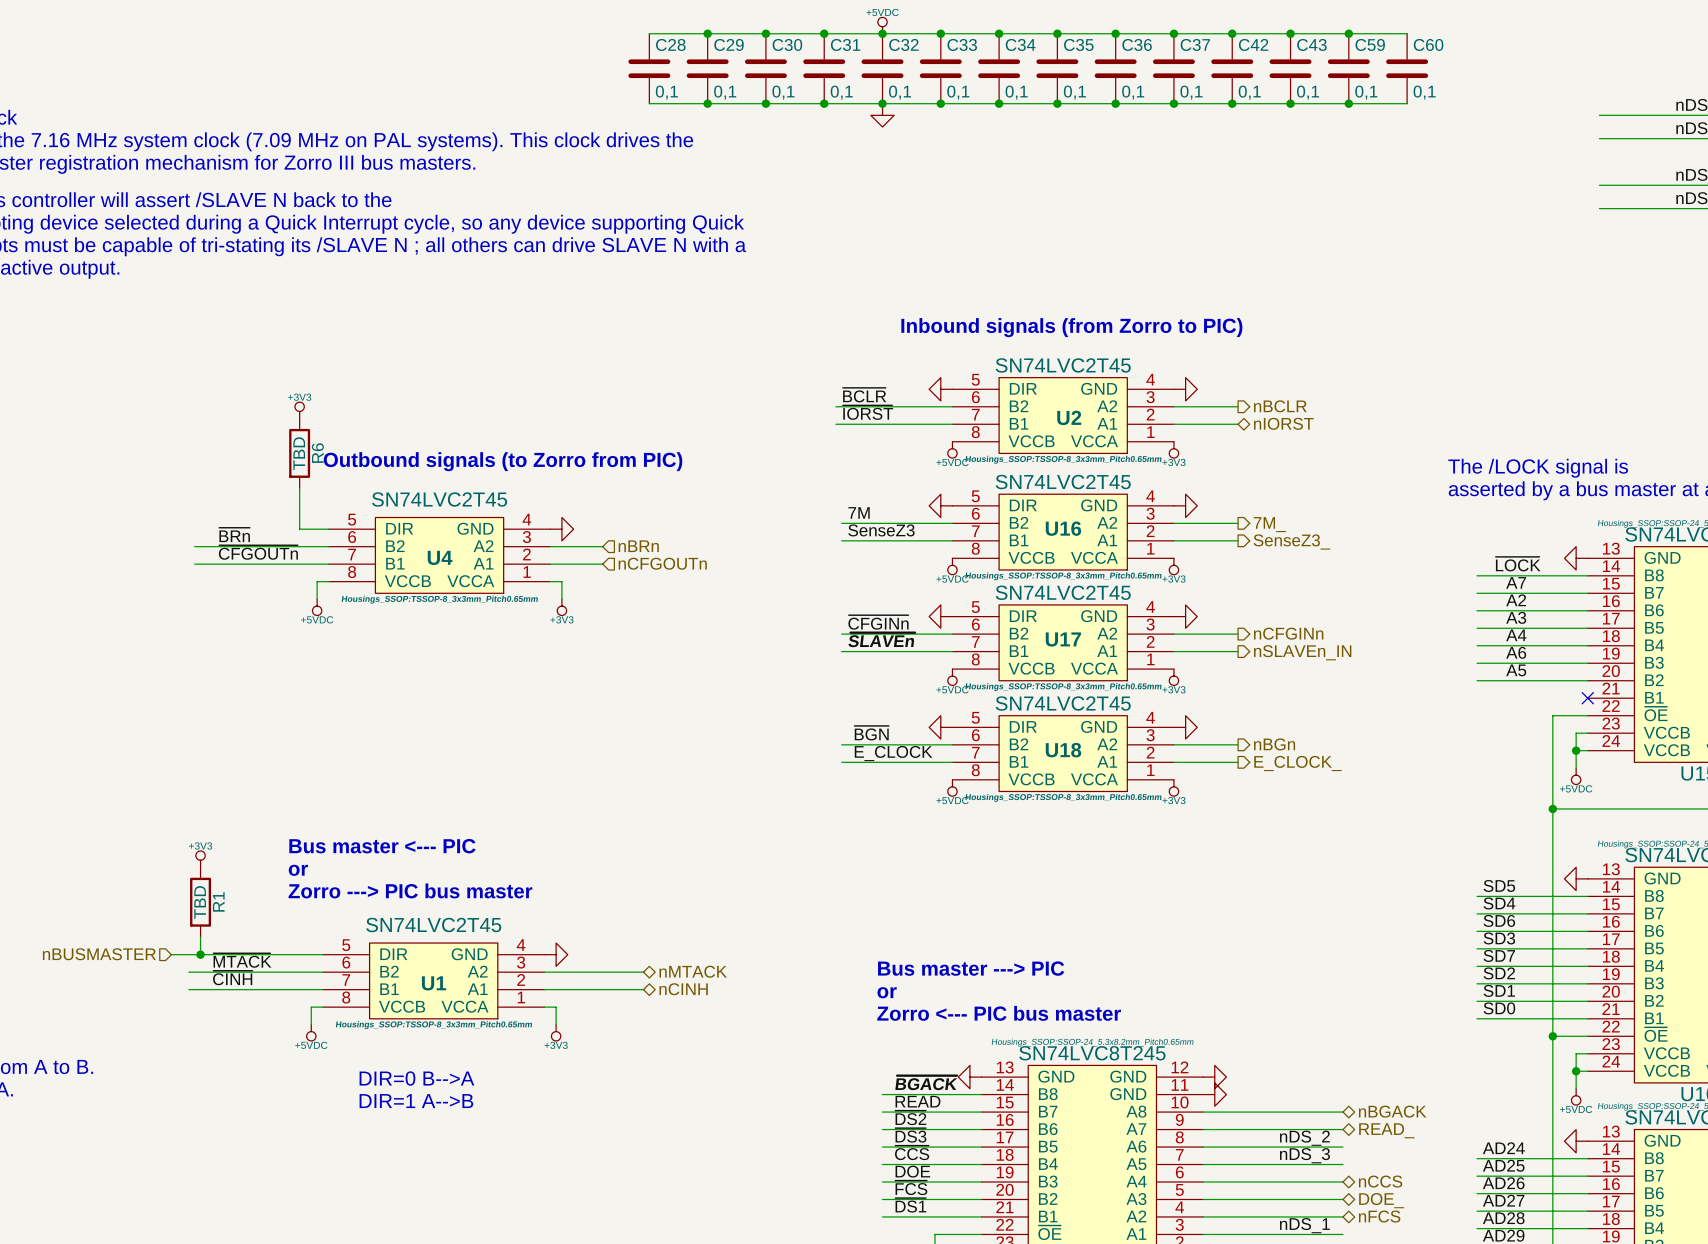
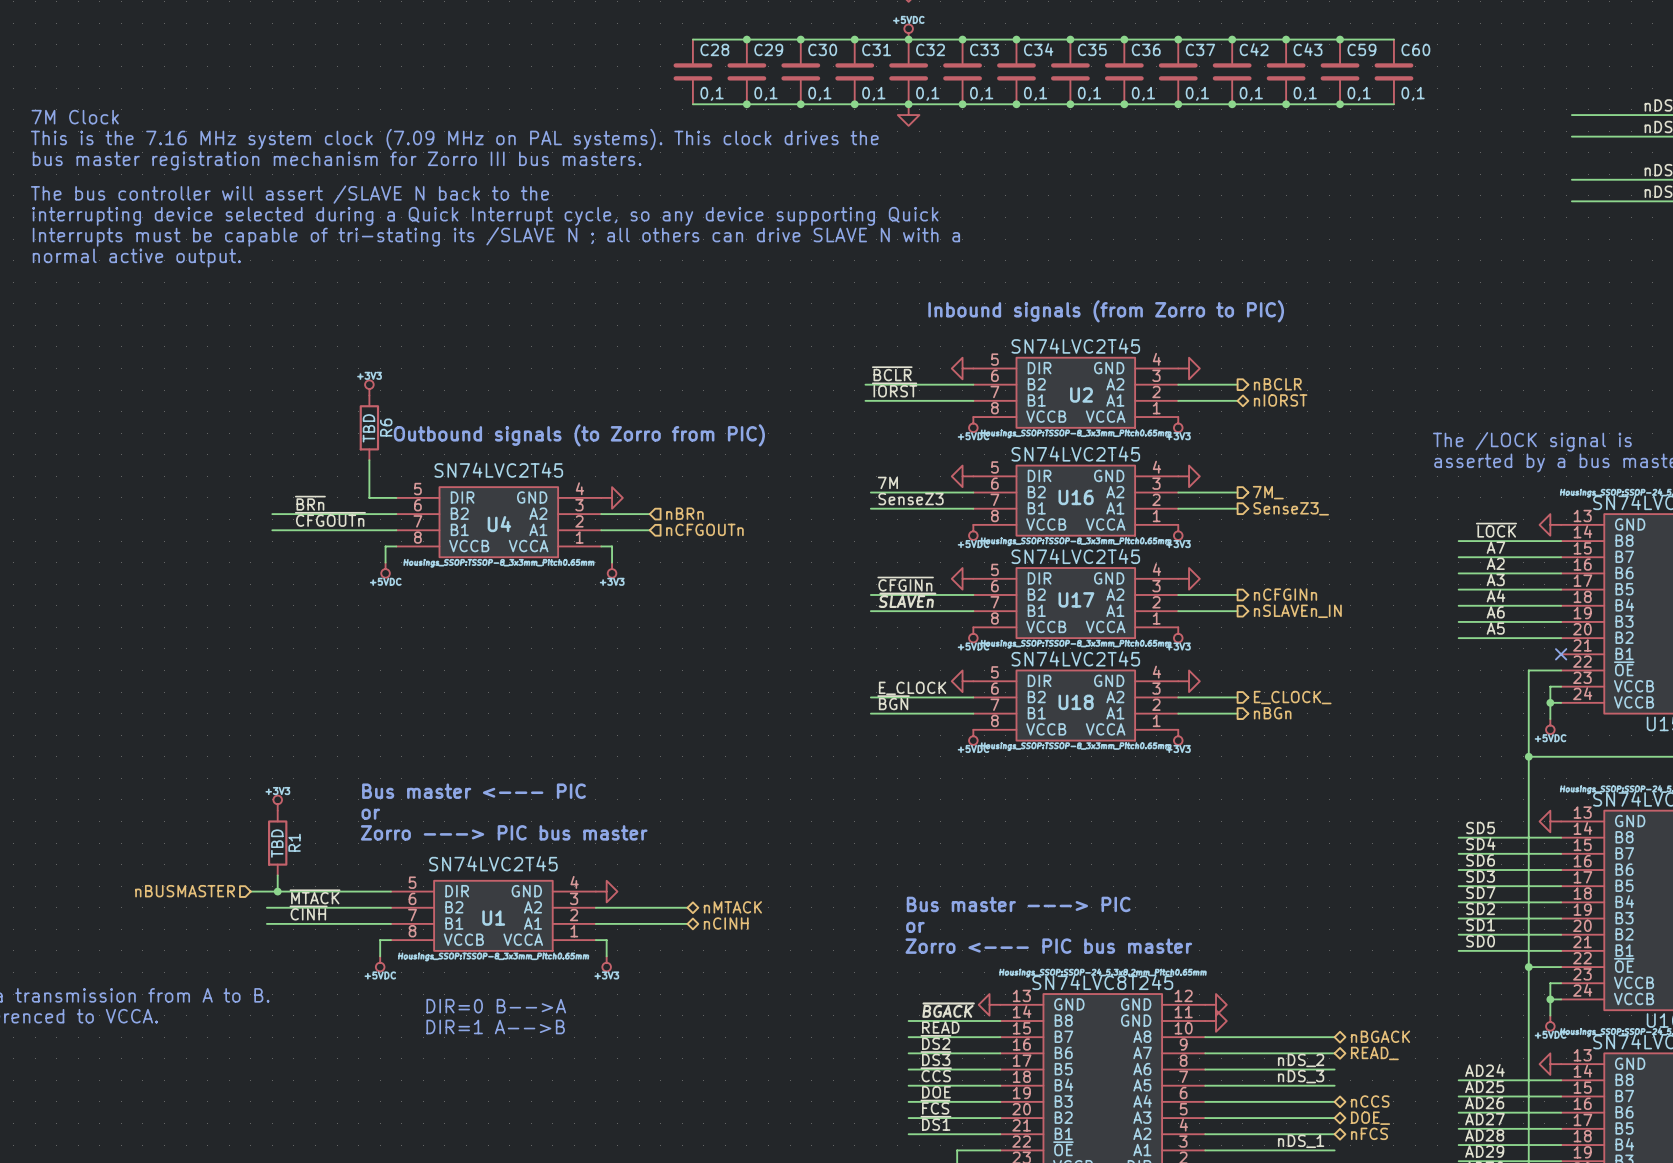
label: ~{BGN} (871, 733) -> E_CLOCK (912, 688)
hierarchical label: nBGn (1274, 744) -> E_CLOCK_ (1292, 697)
label: E_CLOCK (893, 753) -> ~{BGN} (893, 702)
hierarchical label: E_CLOCK_ (1297, 763) -> nBGn (1272, 713)

